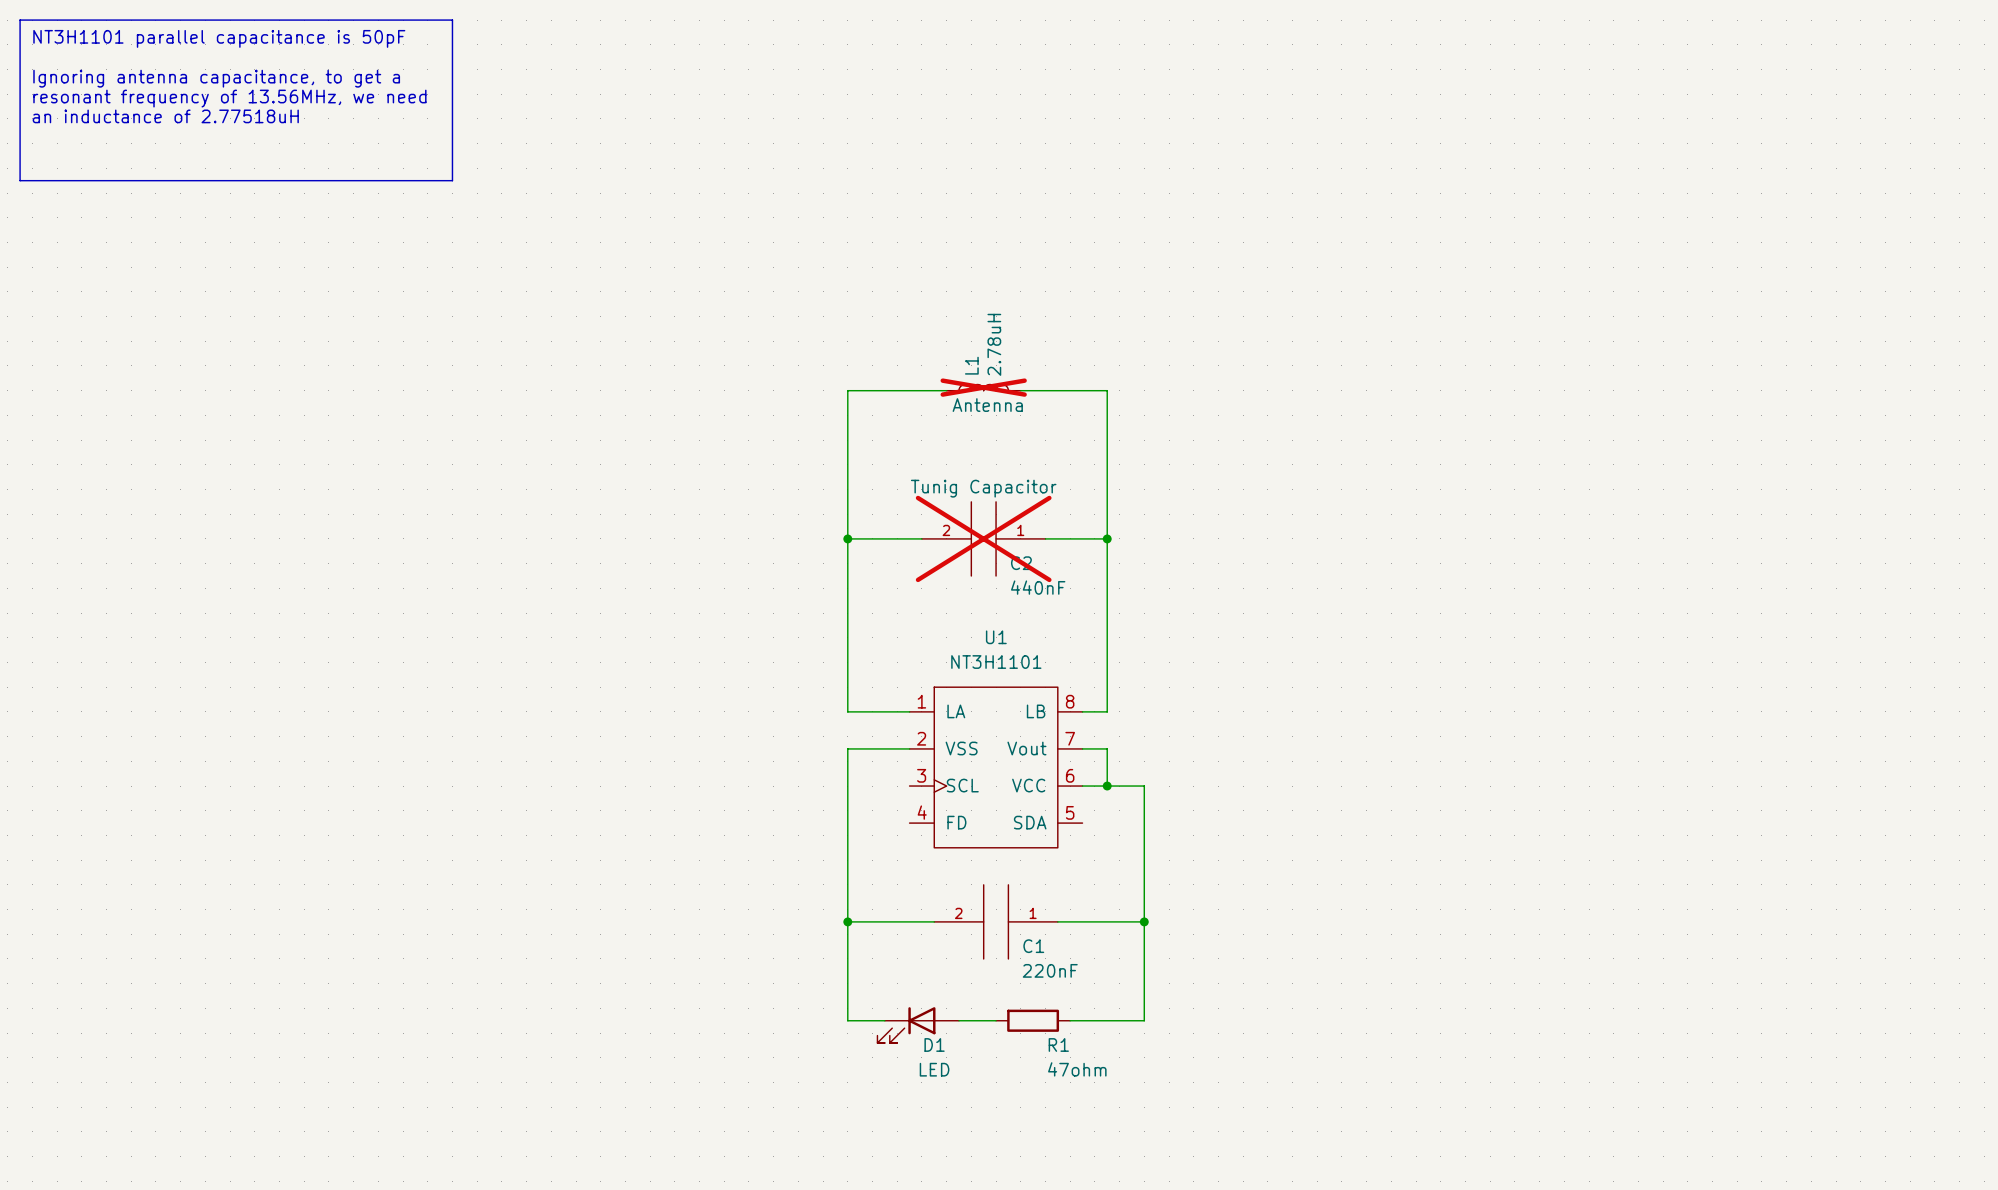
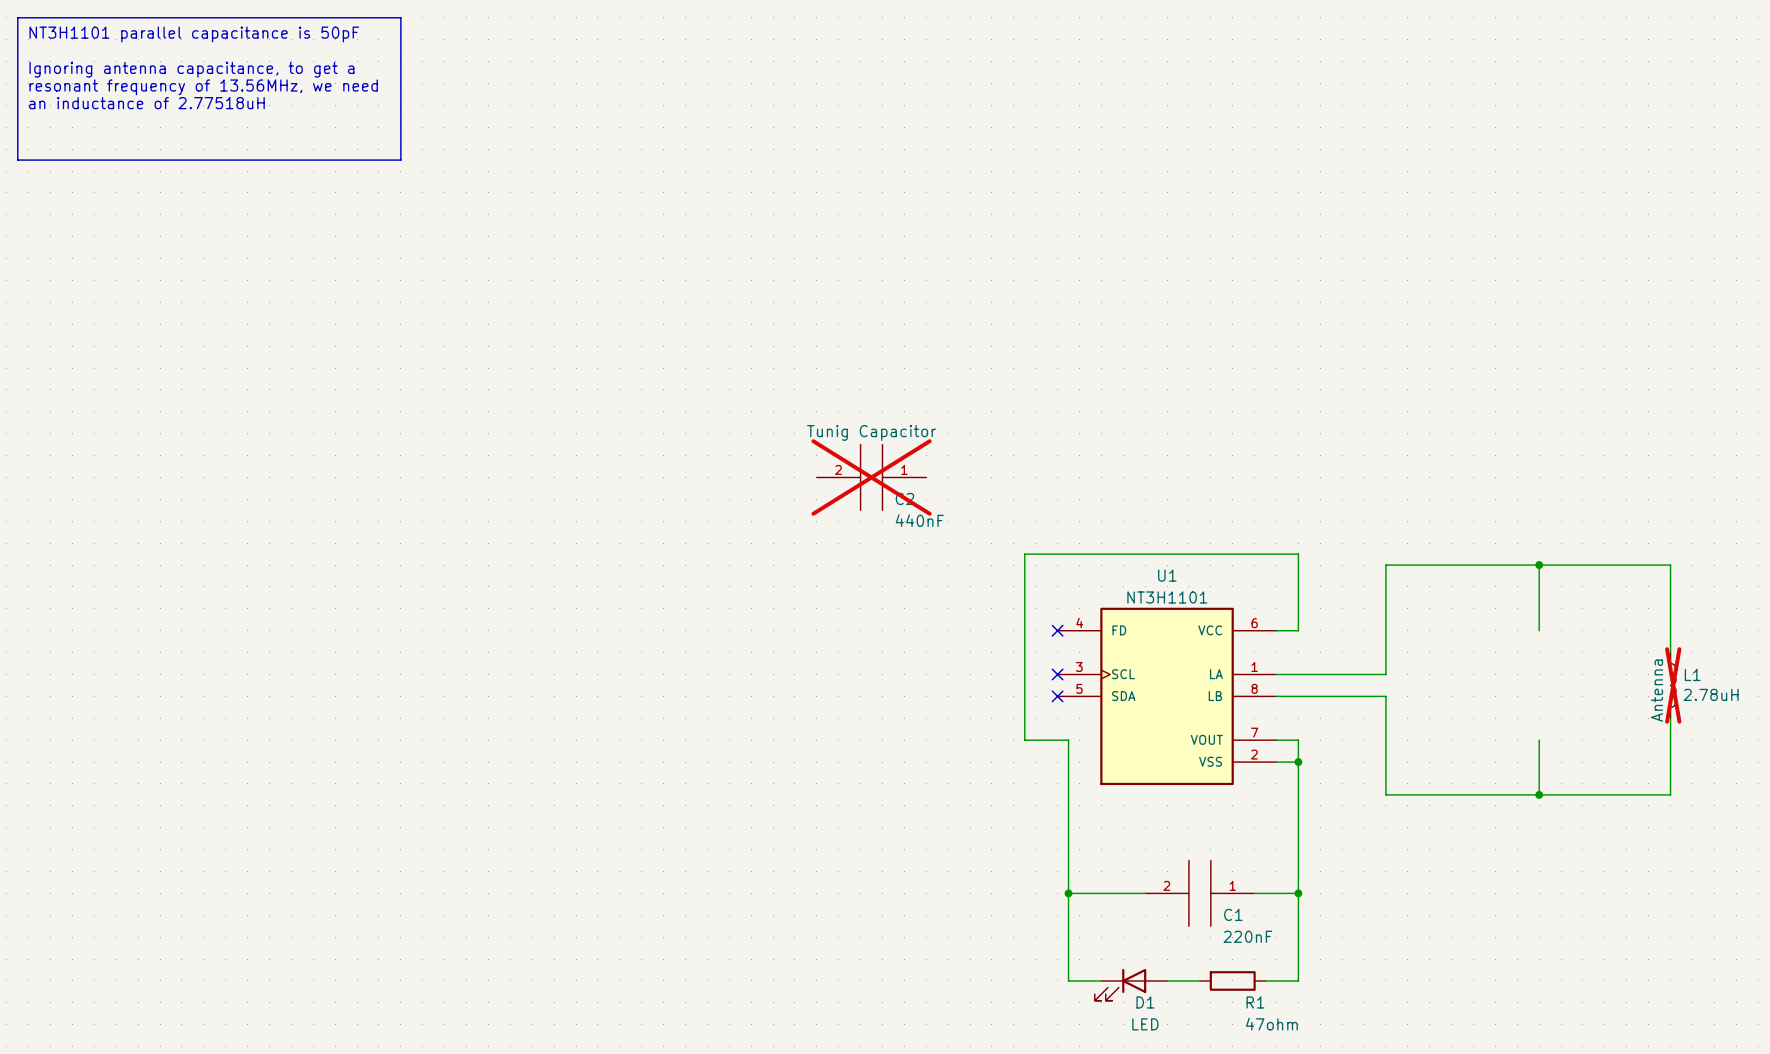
L1 rotation: 0° (983, 387) -> 90° clockwise (1673, 685)
L1 position: (983, 387) -> (1673, 685)
wire: (946, 390) (847, 390) (847, 711) (909, 711) -> none
wire: (1020, 390) (1107, 390) (1107, 711) (1082, 711) -> none
wire: (847, 538) (921, 538) -> none
junction: (847, 538) -> none
wire: (1045, 538) (1107, 538) -> none
junction: (1107, 538) -> none
wire: none -> (1539, 565) (1539, 630)
junction: none -> (1539, 565)
U1 symbol: [909, 687, 1083, 848] -> [1057, 607, 1277, 786]
no-connect mark: none -> (1057, 630)
wire: none -> (1276, 630) (1298, 630) (1298, 554) (1024, 554) (1024, 740) (1068, 740) (1068, 980) (1101, 980)
wire: none -> (1670, 652) (1670, 565) (1385, 565) (1385, 674) (1276, 674)
wire: (909, 748) (847, 748) (847, 1020) (884, 1020) -> none
wire: (1082, 748) (1107, 748) (1107, 786) -> none
no-connect mark: none -> (1057, 674)
wire: (1082, 786) (1144, 786) (1144, 1020) (1070, 1020) -> none
junction: (1107, 786) -> none
no-connect mark: none -> (1057, 696)
wire: none -> (1276, 696) (1385, 696) (1385, 794) (1670, 794) (1670, 718)
wire: none -> (1276, 740) (1298, 740) (1298, 980) (1265, 980)
wire: none -> (1539, 740) (1539, 794)
wire: none -> (1276, 762) (1298, 762)
junction: none -> (1298, 762)
junction: none -> (1539, 794)
wire: (847, 921) (934, 921) -> none
junction: (847, 921) -> none
C1 position: (996, 921) -> (1199, 893)
wire: (1057, 921) (1144, 921) -> (1068, 893) (1145, 893)
junction: (1144, 921) -> none
junction: none -> (1068, 893)
wire: none -> (1254, 893) (1298, 893)
junction: none -> (1298, 893)
wire: (958, 1020) (996, 1020) -> none
R1 position: (1033, 1020) -> (1232, 980)
D1 position: (918, 1025) -> (1130, 984)
wire: none -> (1167, 980) (1199, 980)

